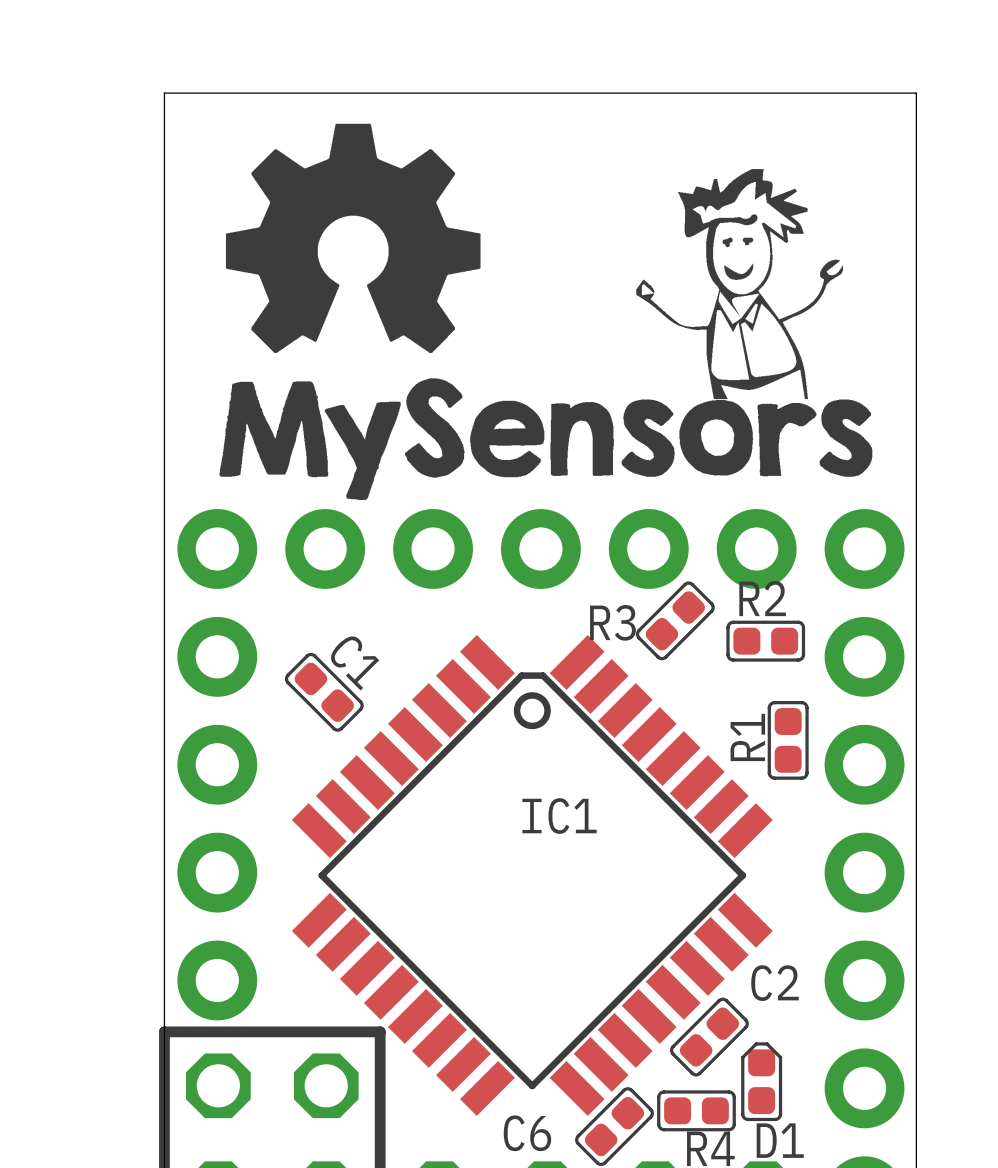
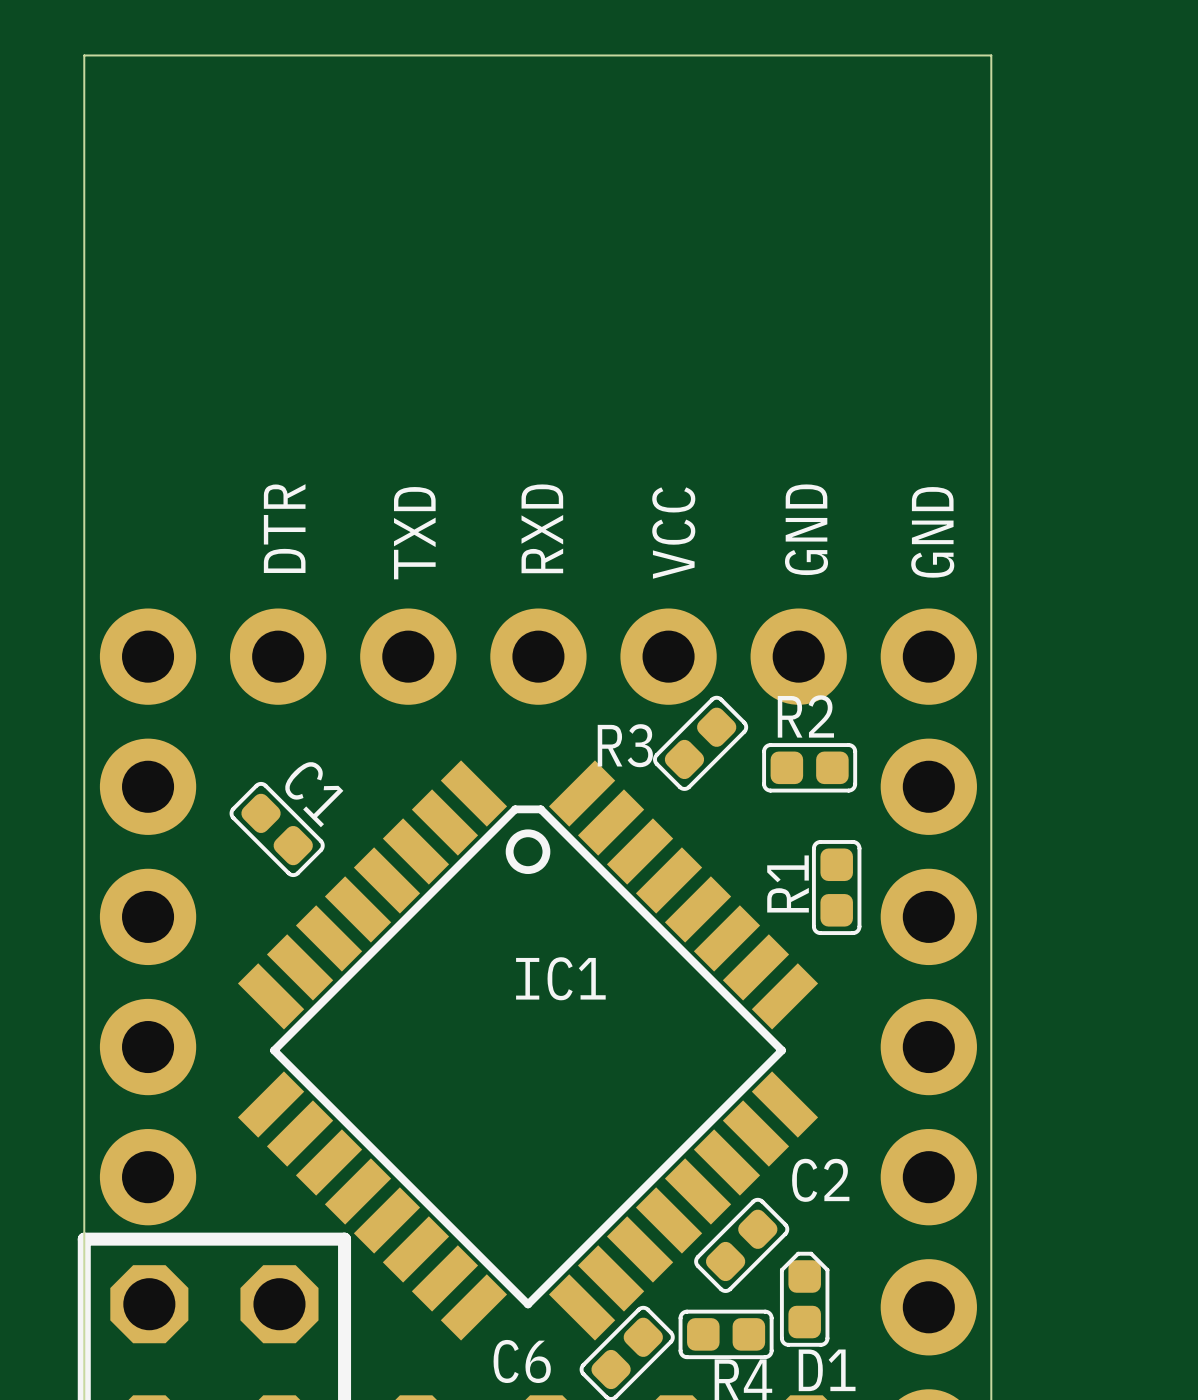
board edge: (164, 93) (916, 93) -> (84, 106) (84, 55) (991, 55) (991, 106)
drawing: [219, 123, 873, 501] -> none
text: none -> DTR (284, 528)
text: none -> RXD (542, 528)
text: none -> GND (806, 529)
text: none -> GND (932, 532)
text: none -> TXD (414, 533)
text: none -> VCC (673, 533)

